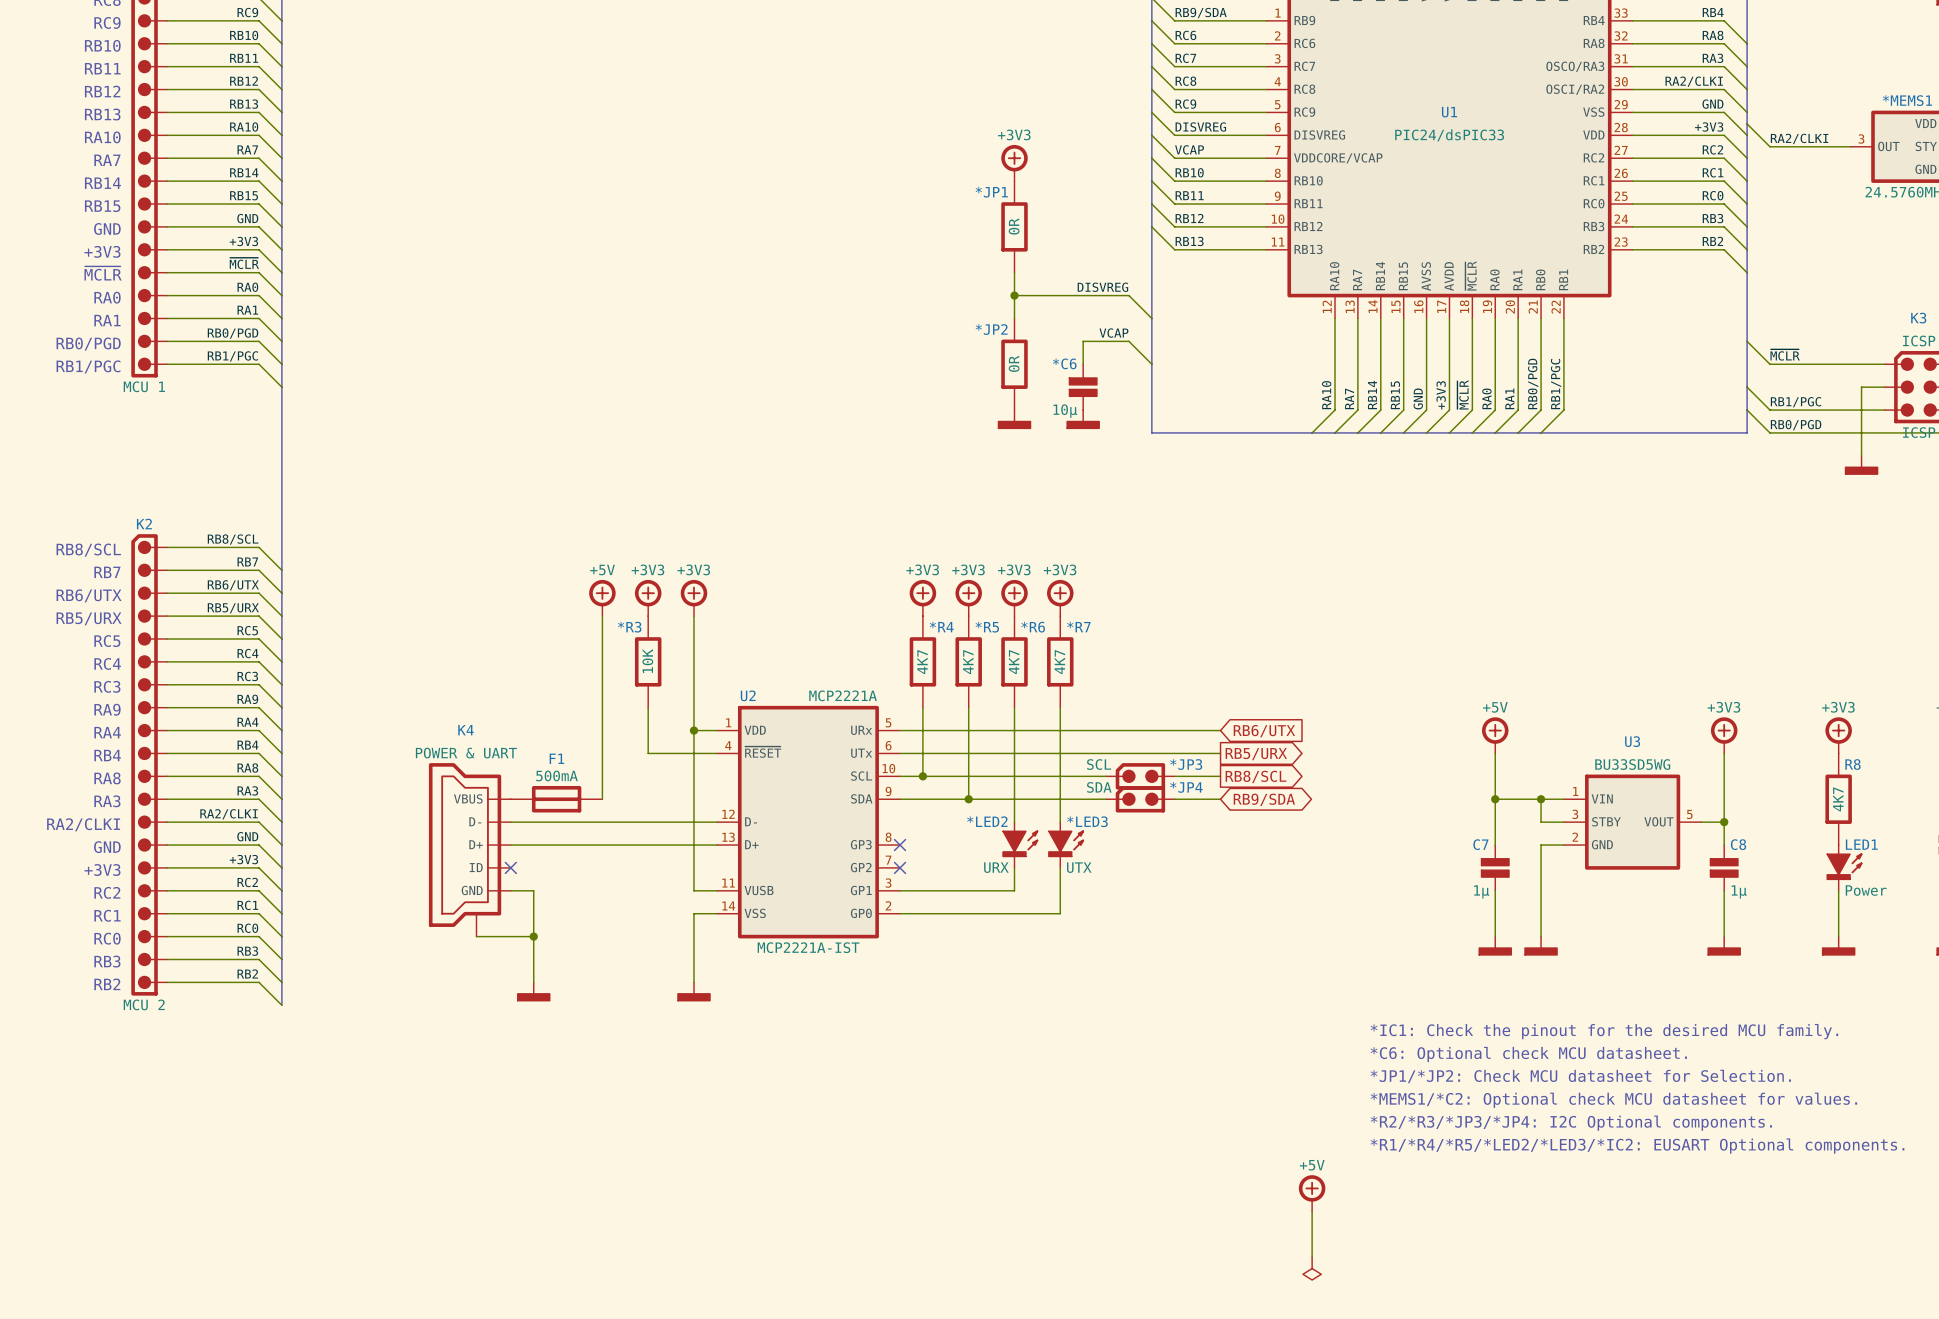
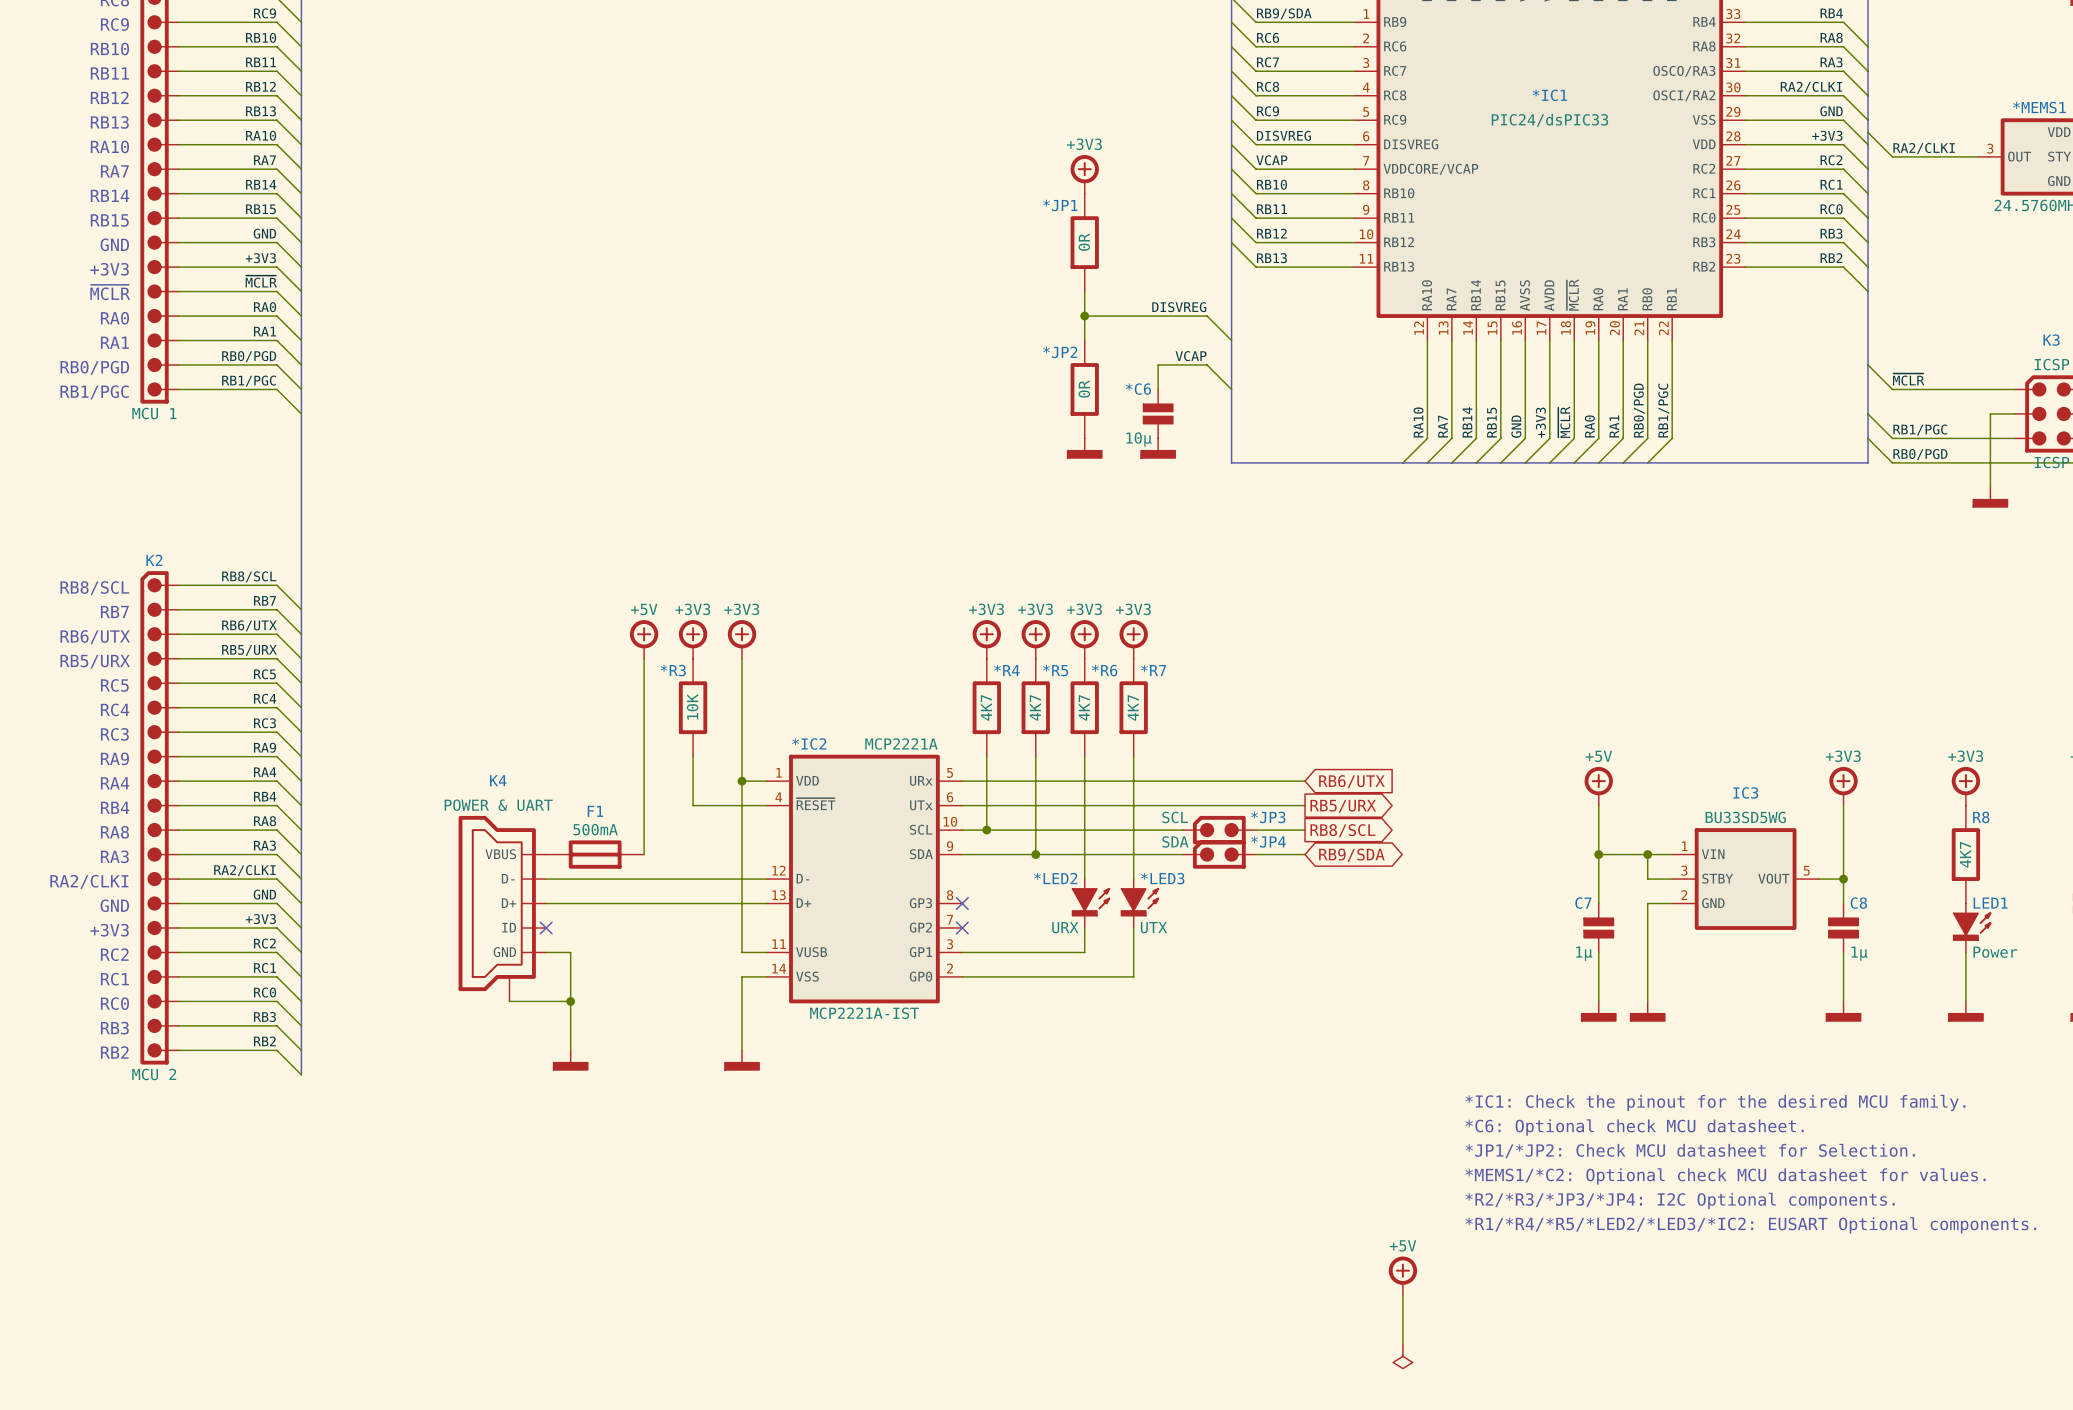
U1 name: U1 (1449, 112) -> *IC1 (1549, 95)
U1 value position: PIC24/dsPIC33 (1449, 135) -> PIC24/dsPIC33 (1549, 120)
U2 name: U2 (748, 695) -> *IC2 (809, 744)
U3 name: U3 (1632, 741) -> IC3 (1745, 792)

